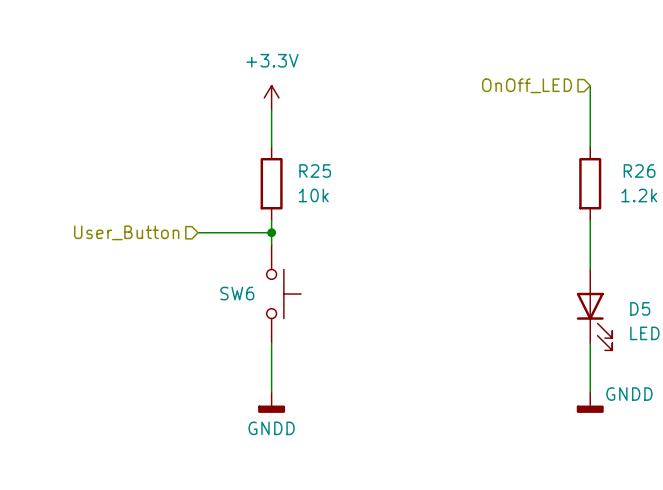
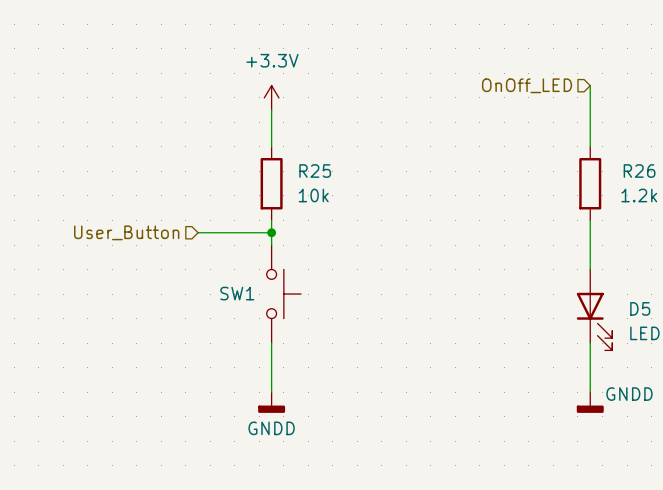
SW6 name: SW6 (237, 293) -> SW1 (237, 293)

